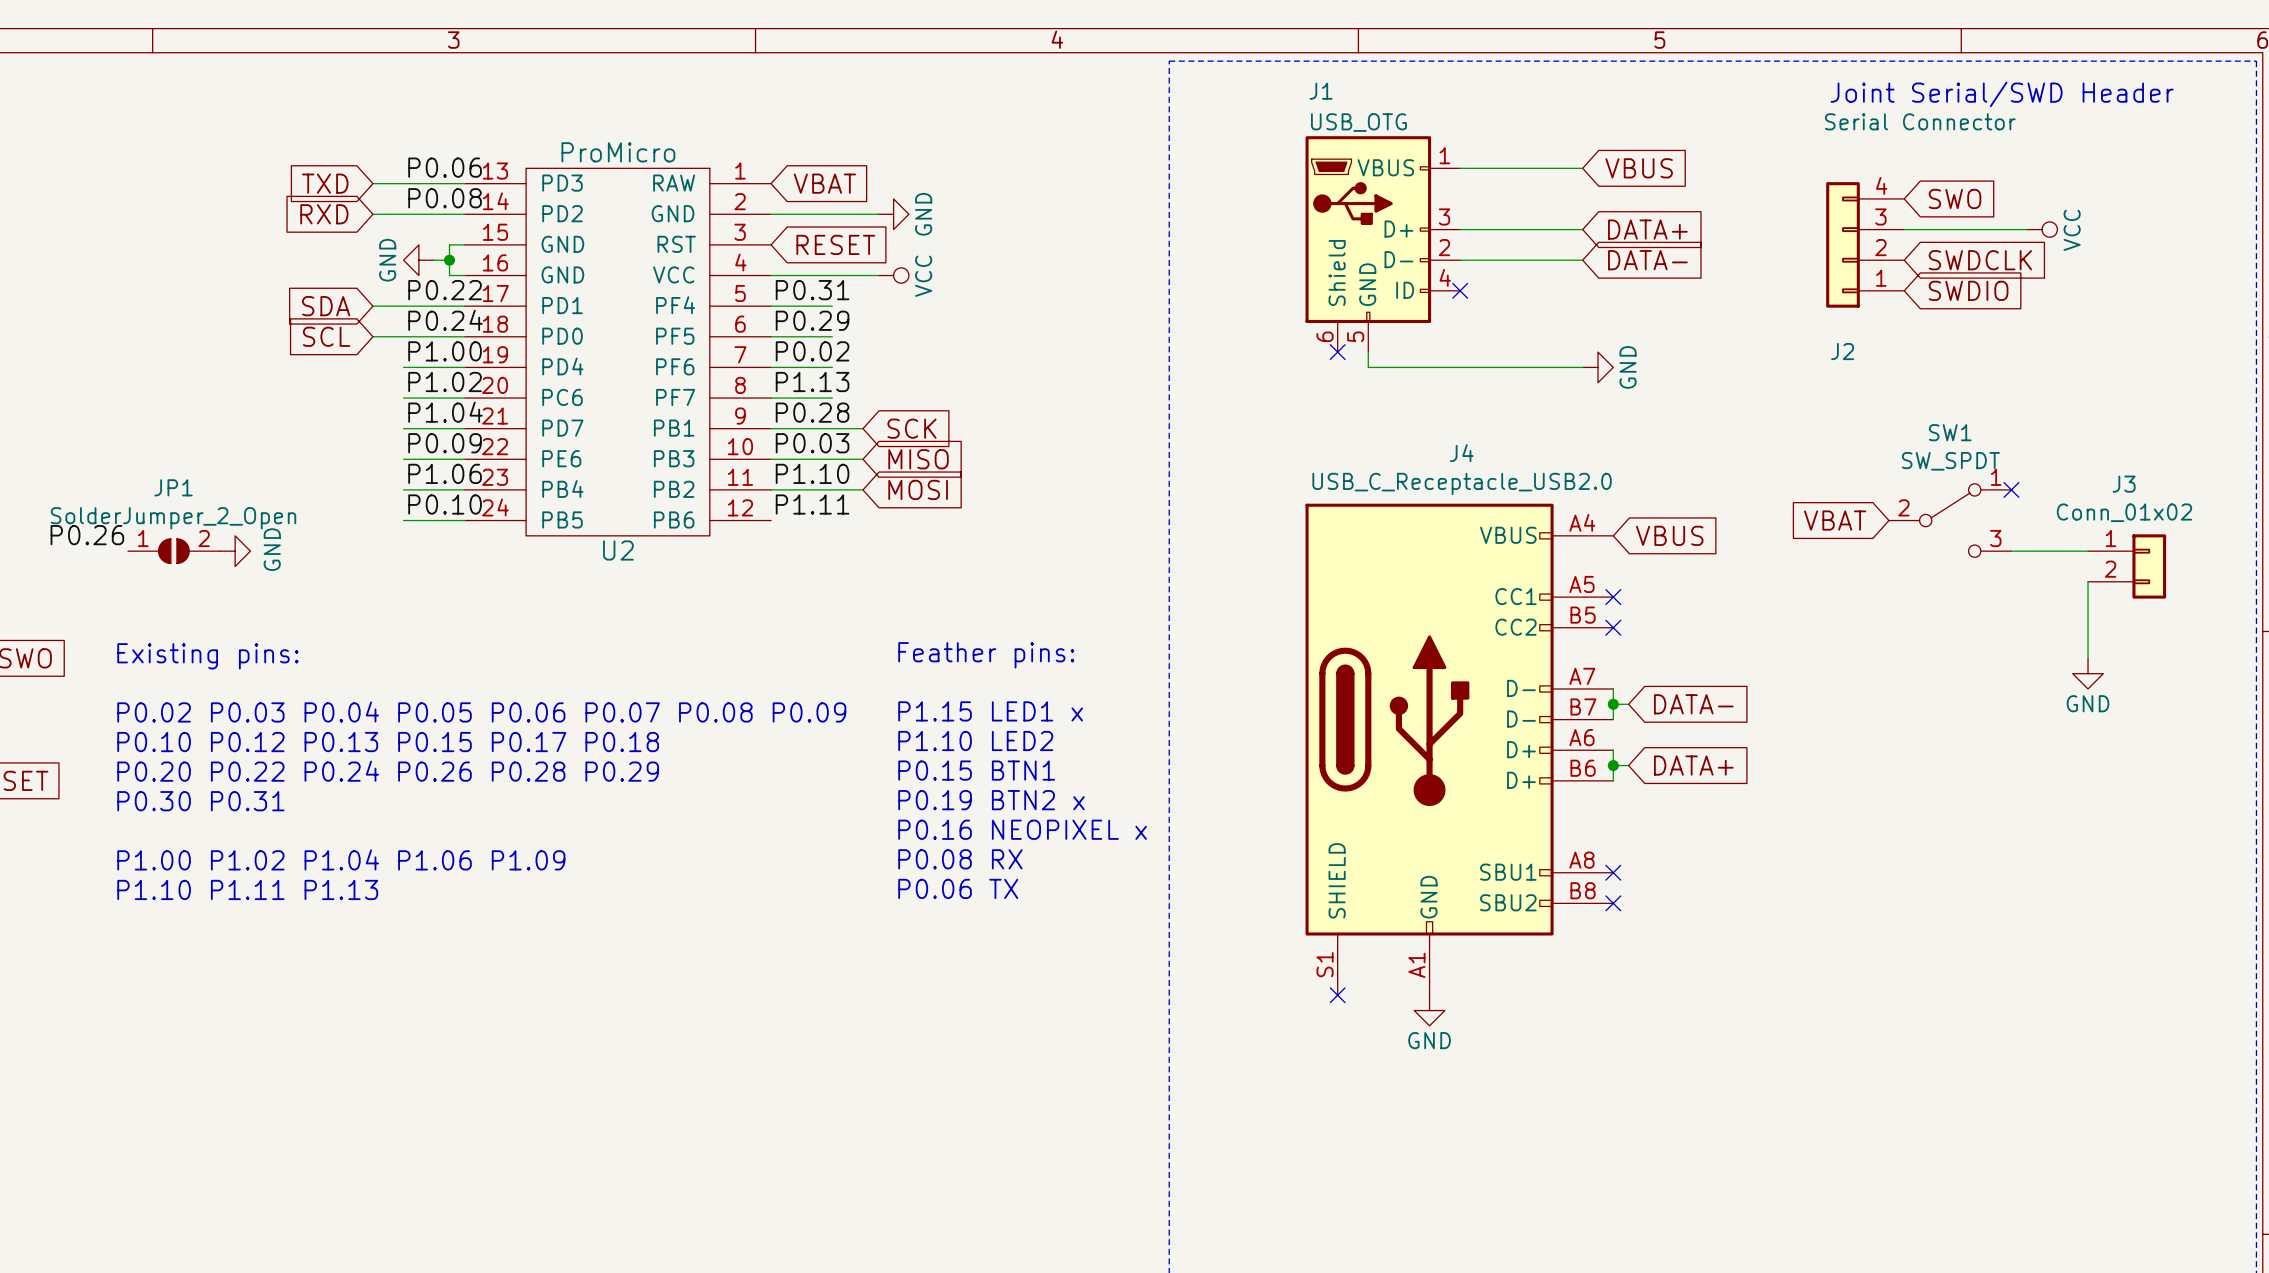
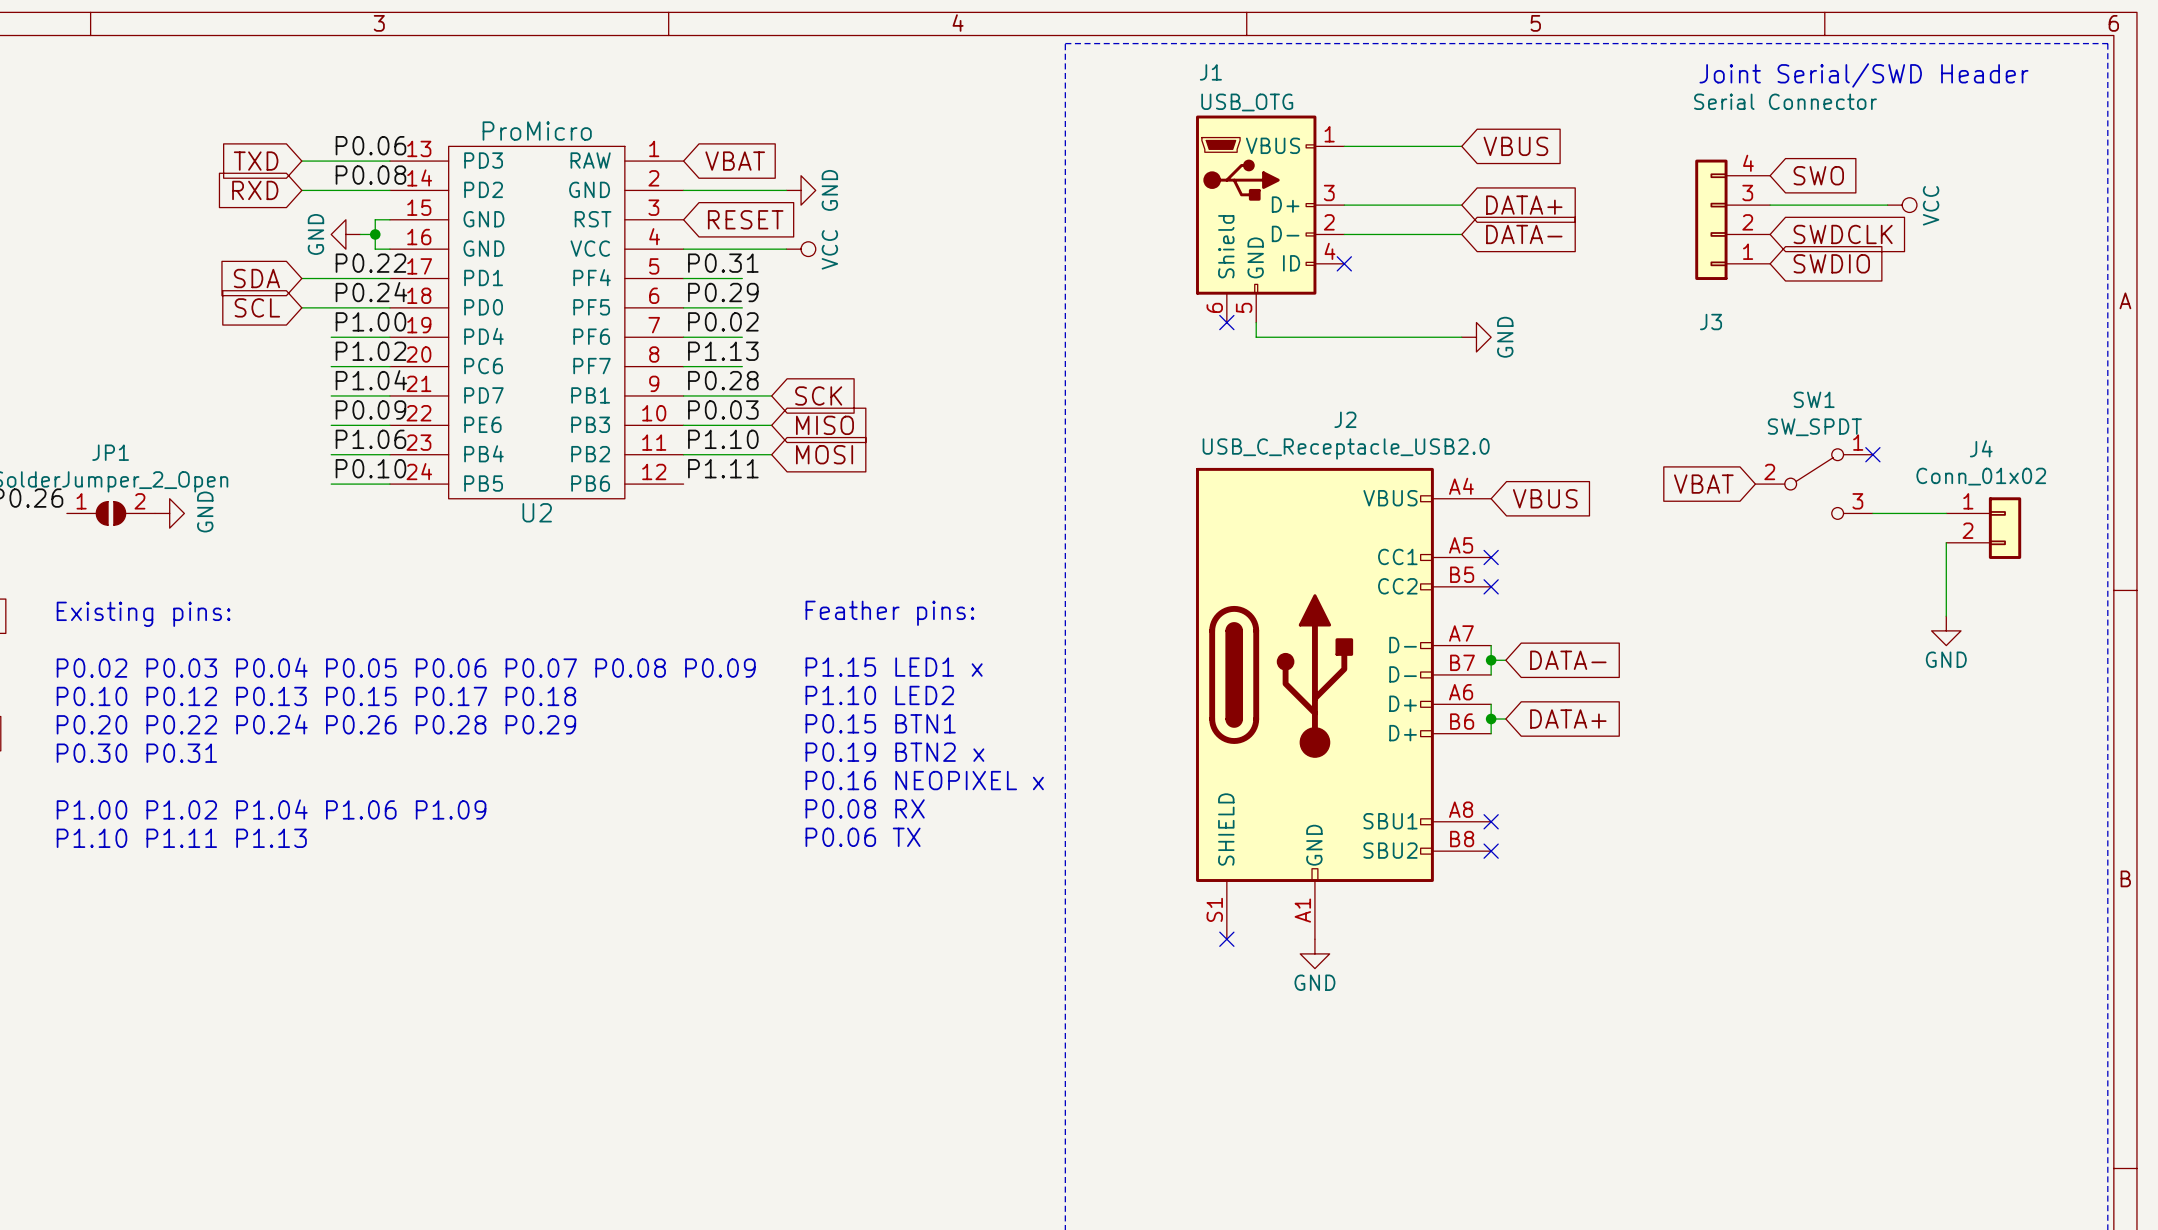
J2 name: J2 (1842, 351) -> J3 (1711, 322)
J4 name: J4 (1461, 453) -> J2 (1345, 419)
J3 name: J3 (2124, 484) -> J4 (1981, 448)

